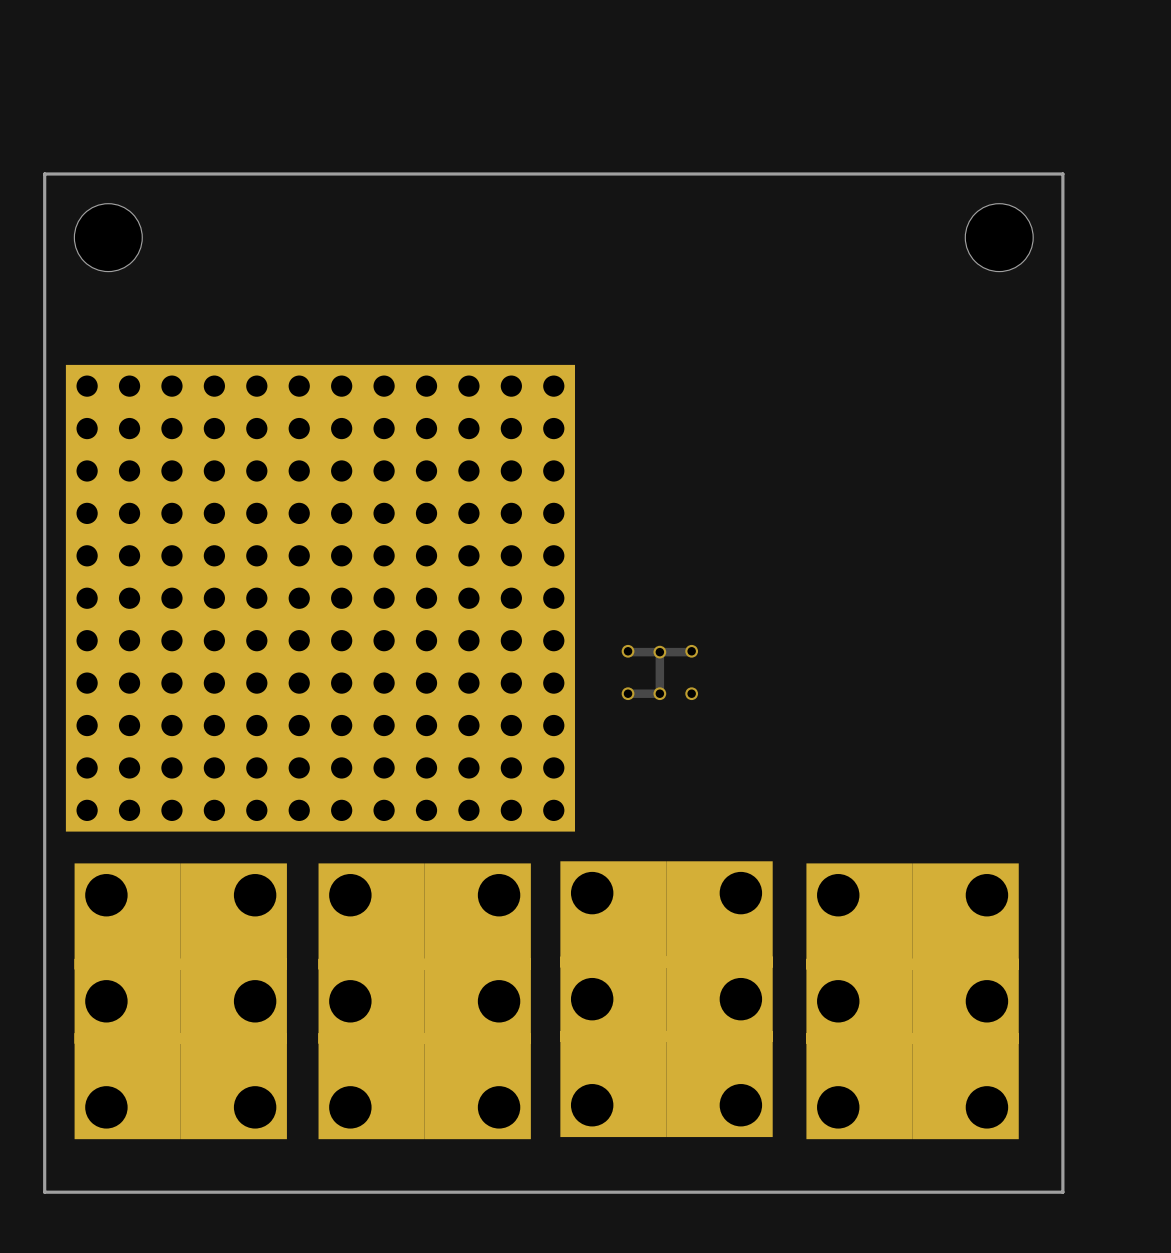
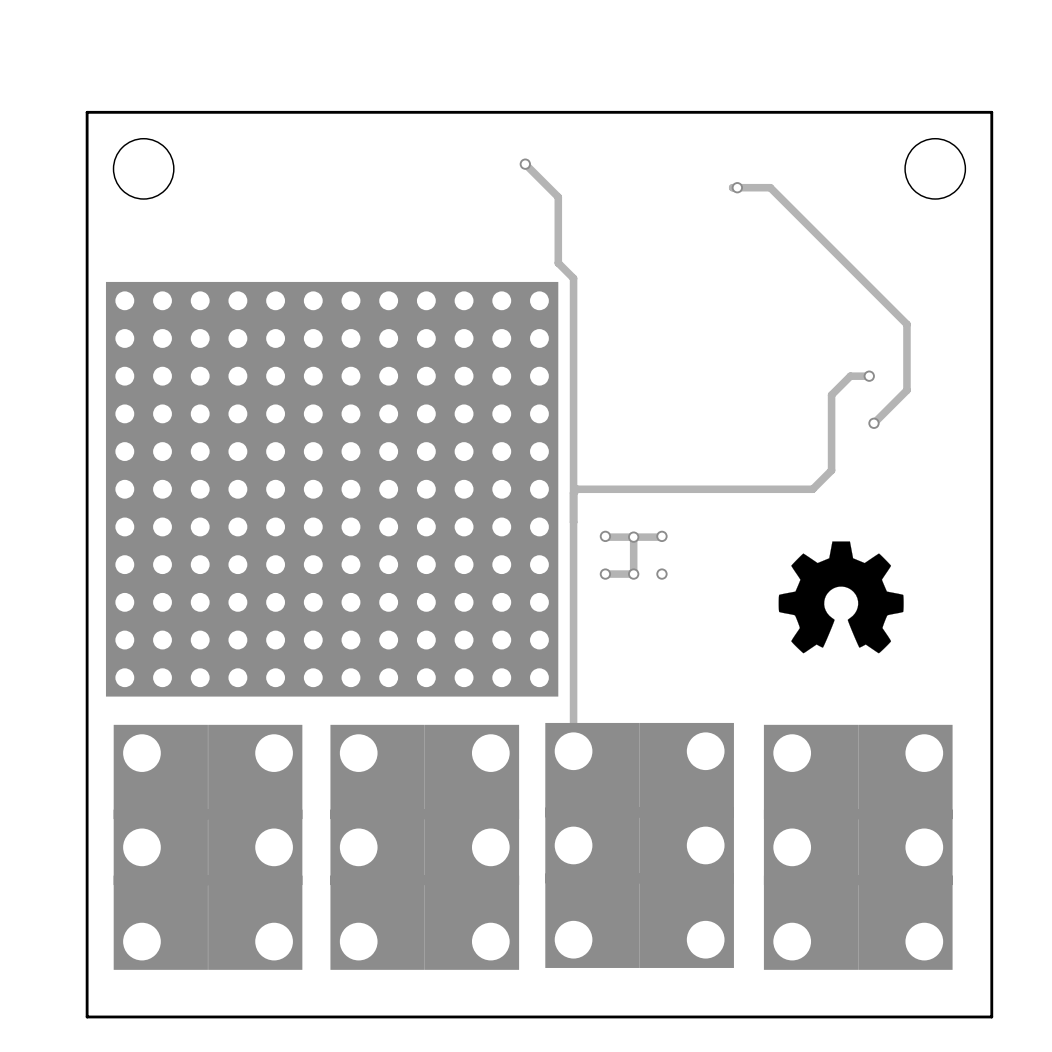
track: none -> (525, 164) (558, 197) (558, 263) (573, 278) (573, 751)
via: none -> (525, 164)
track: none -> (732, 187) (770, 187) (906, 324) (906, 390) (873, 423)
via: none -> (737, 187)
track: none -> (869, 376) (850, 376) (831, 395) (831, 470) (812, 489) (577, 489) (573, 492)
via: none -> (869, 376)
via: none -> (873, 423)
drawing: none -> [778, 541, 904, 654]

